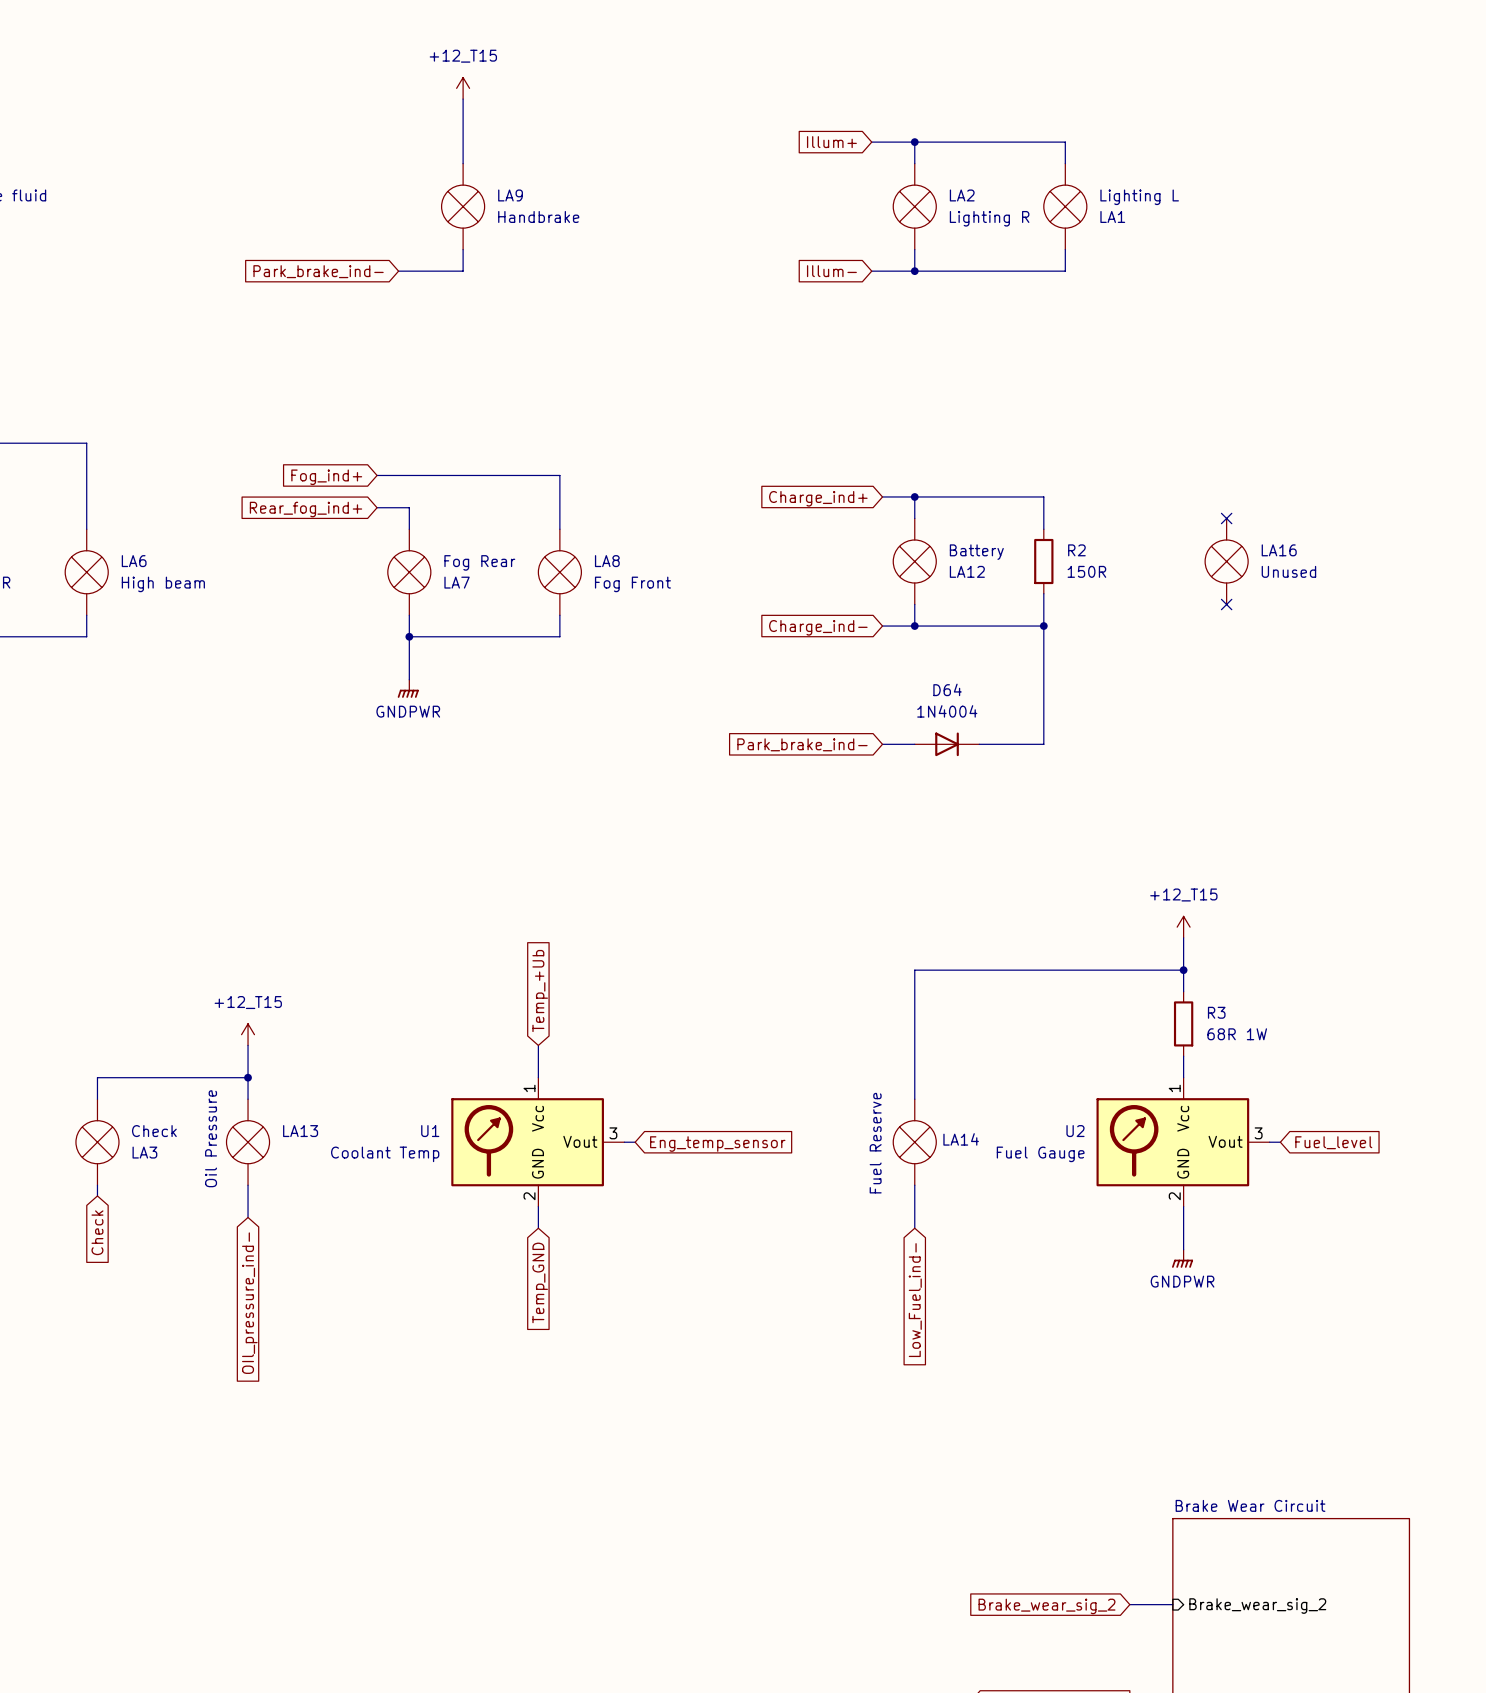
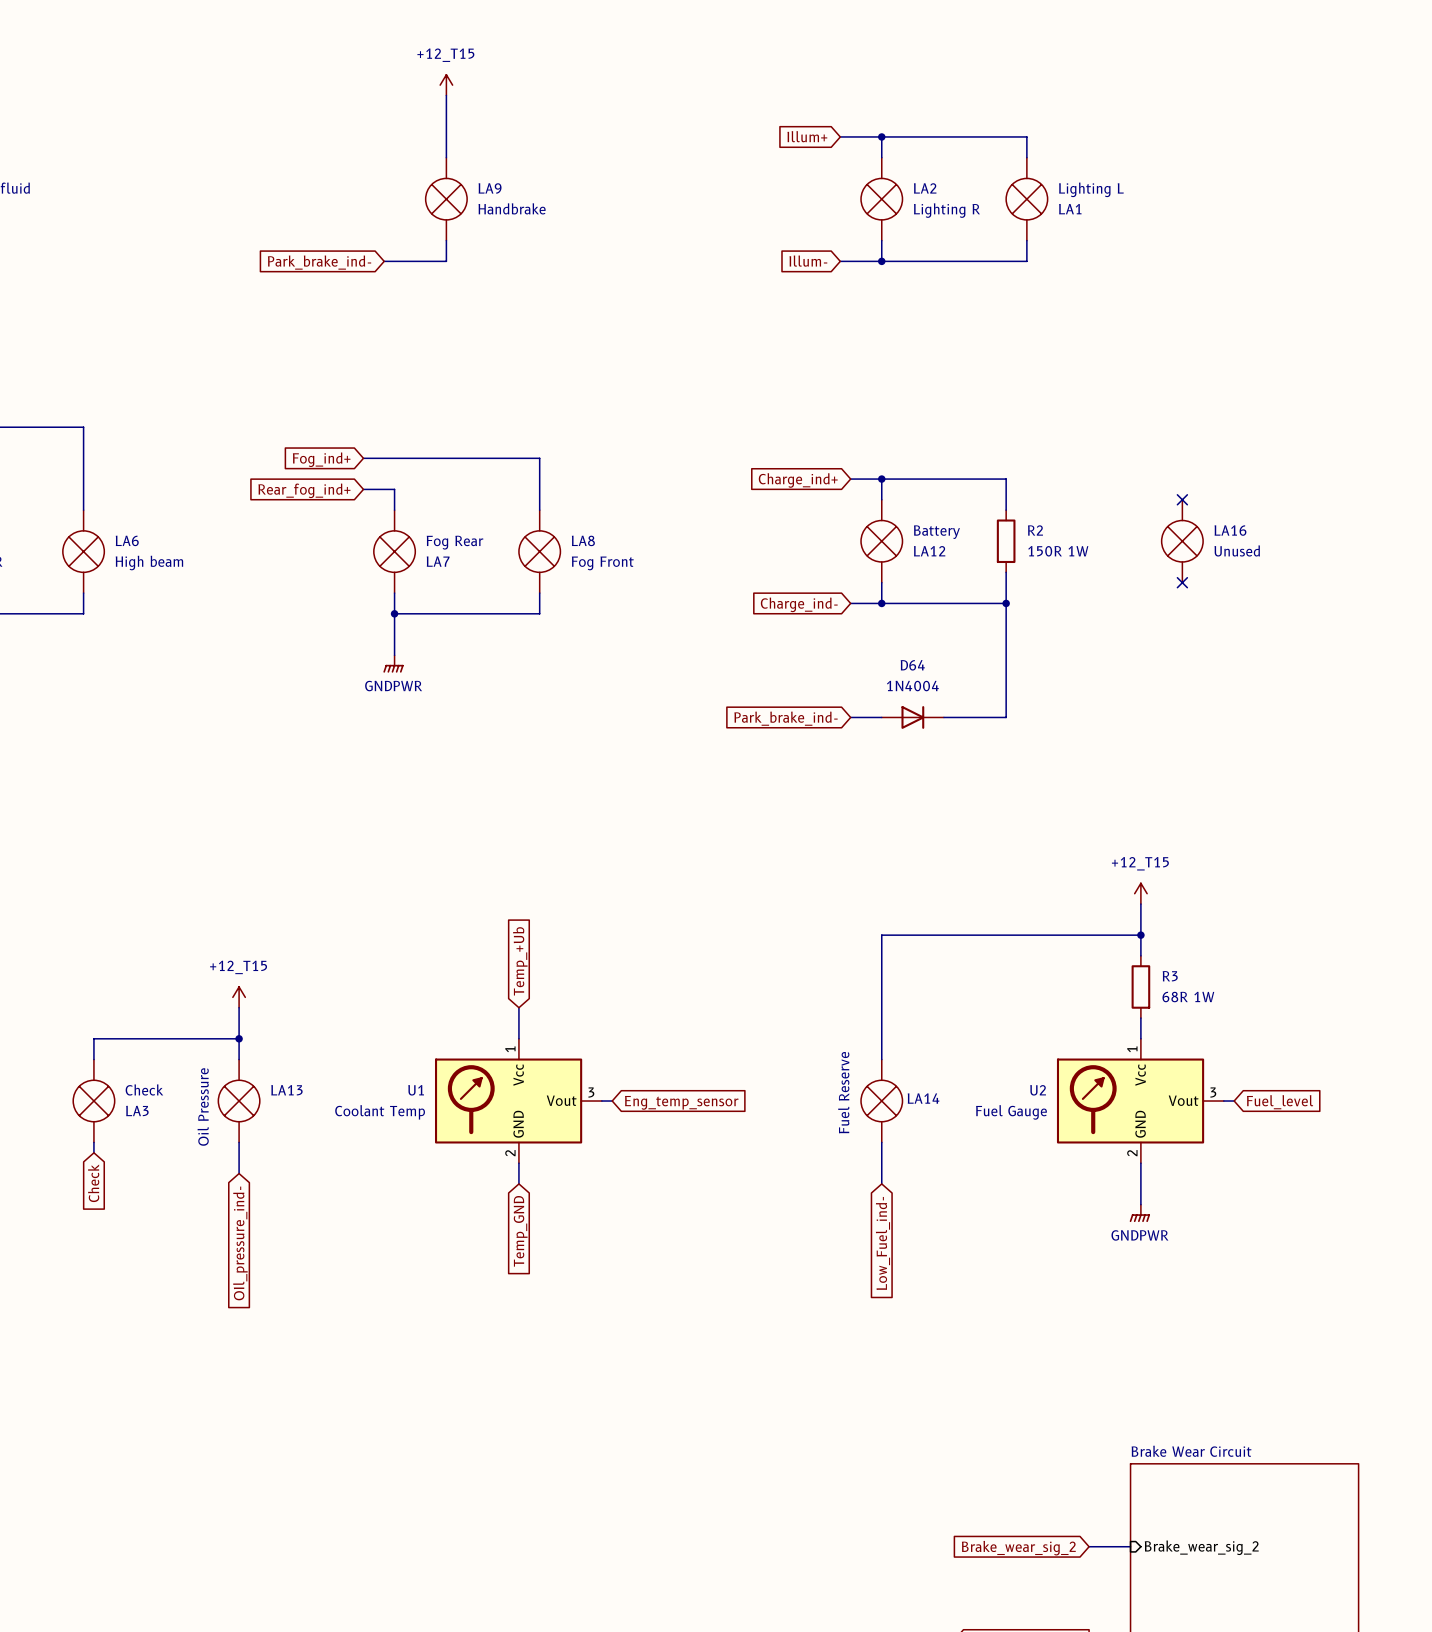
R2 value: 150R (1086, 571) -> 150R 1W (1058, 551)

